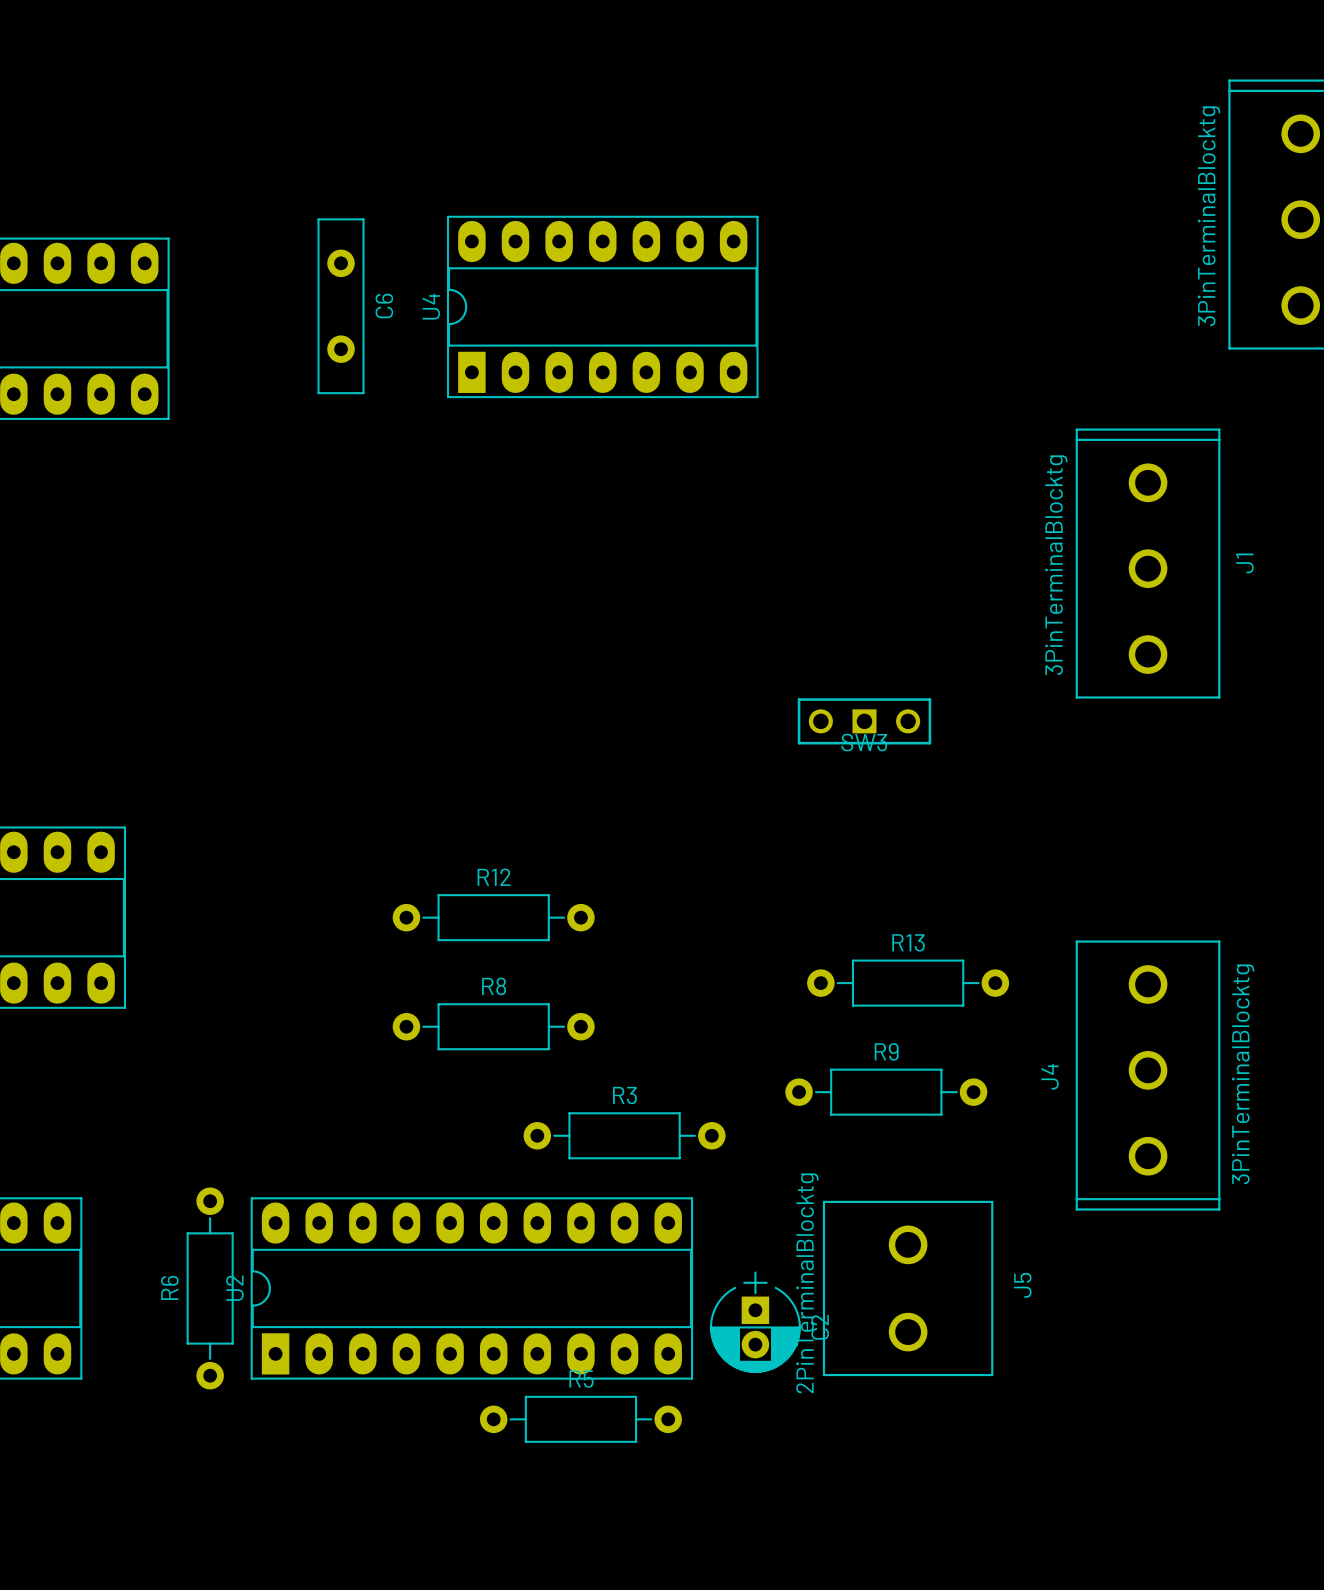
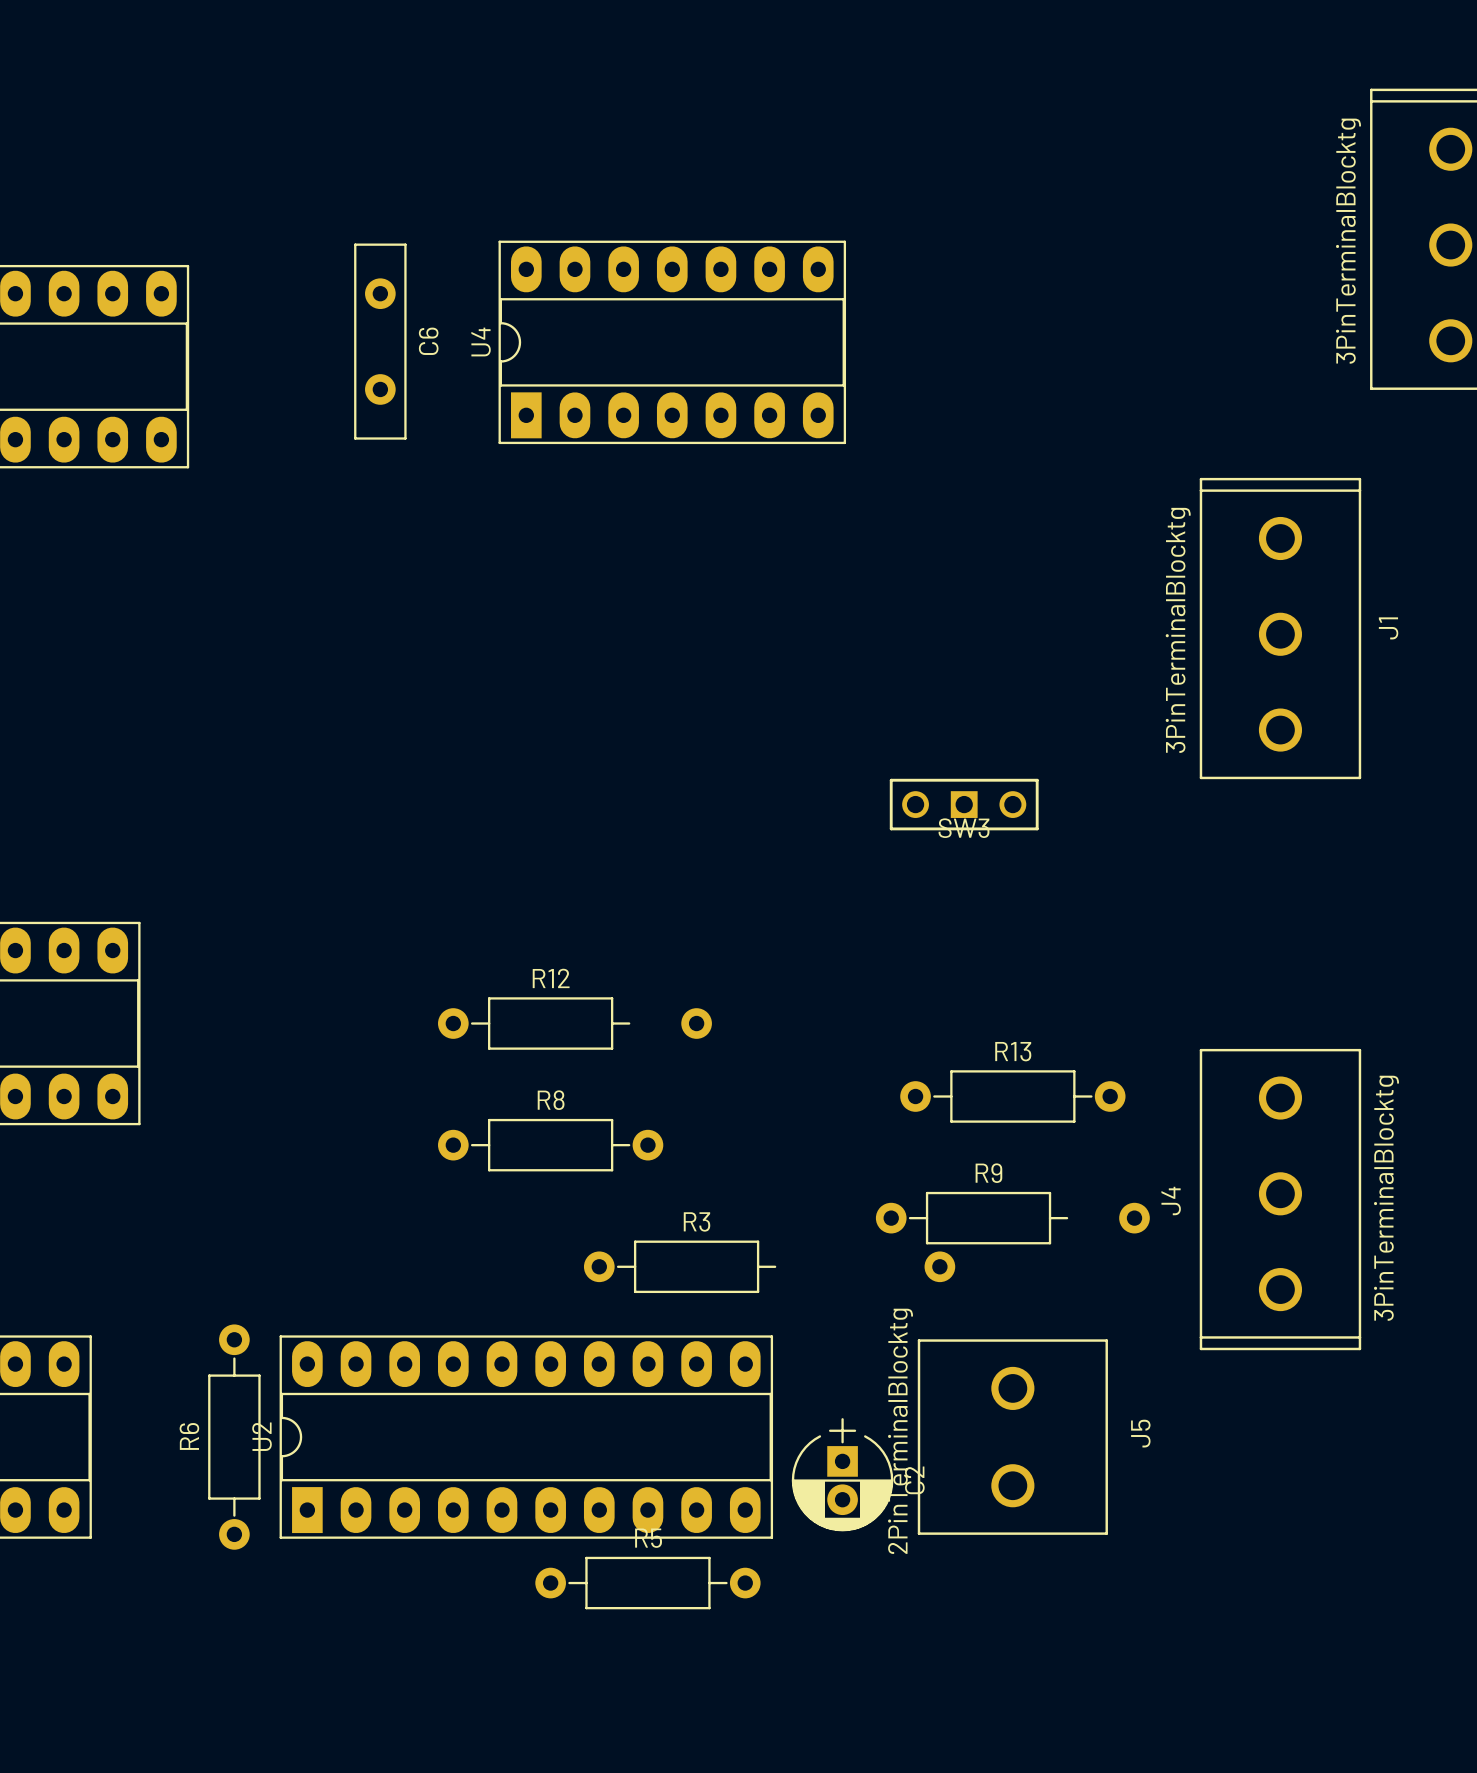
R12 footprint: [392, 894, 595, 942] -> [438, 997, 712, 1050]
R9 footprint: [785, 1068, 988, 1116] -> [875, 1191, 1150, 1245]
R3 footprint: [523, 1112, 726, 1160] -> [583, 1240, 956, 1294]

